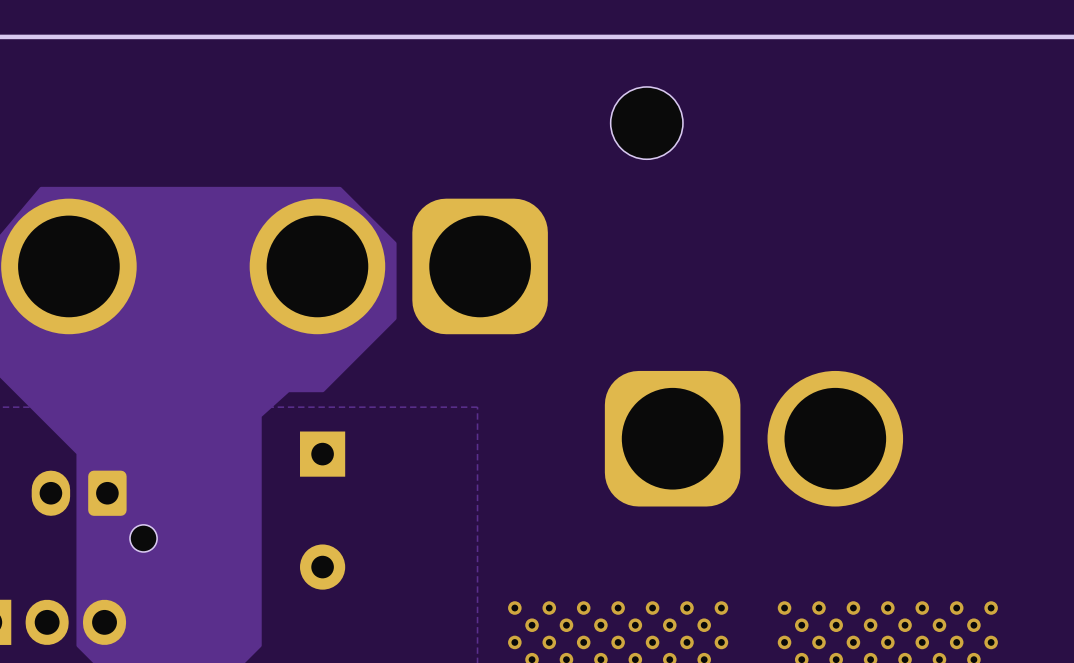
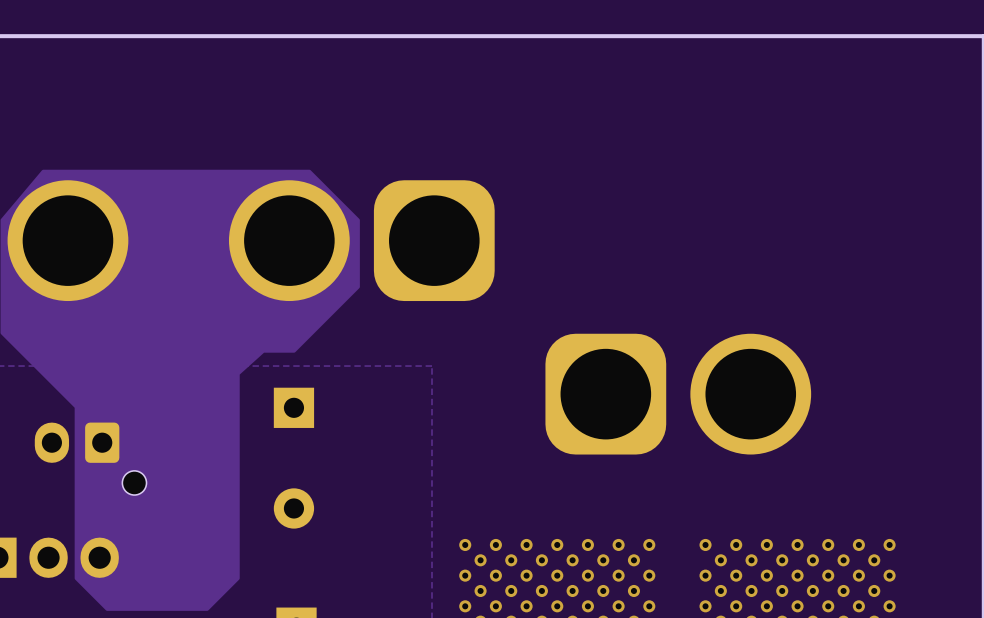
part: (646, 123) -> none

